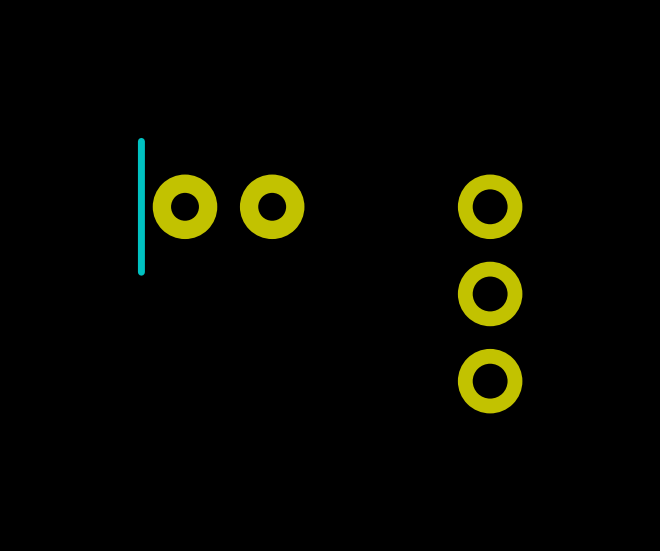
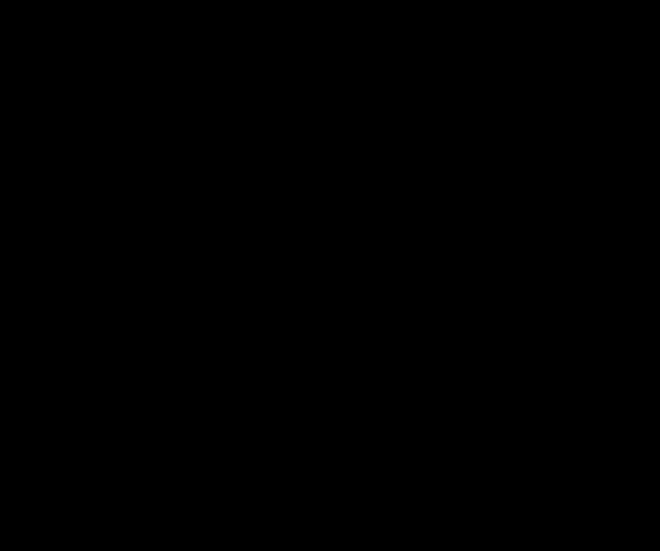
part: (221, 206) -> none
part: (490, 293) -> none

